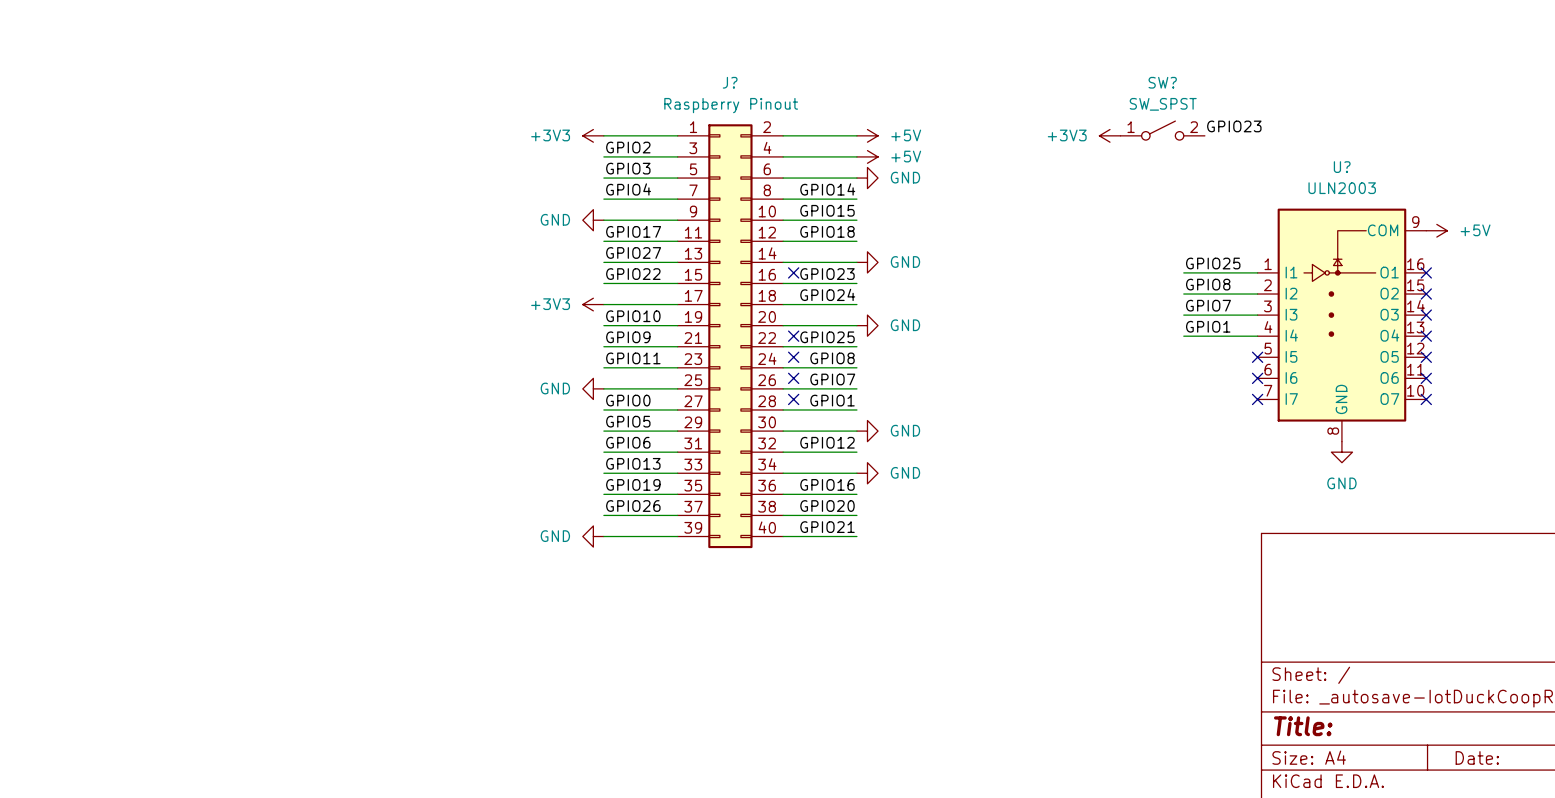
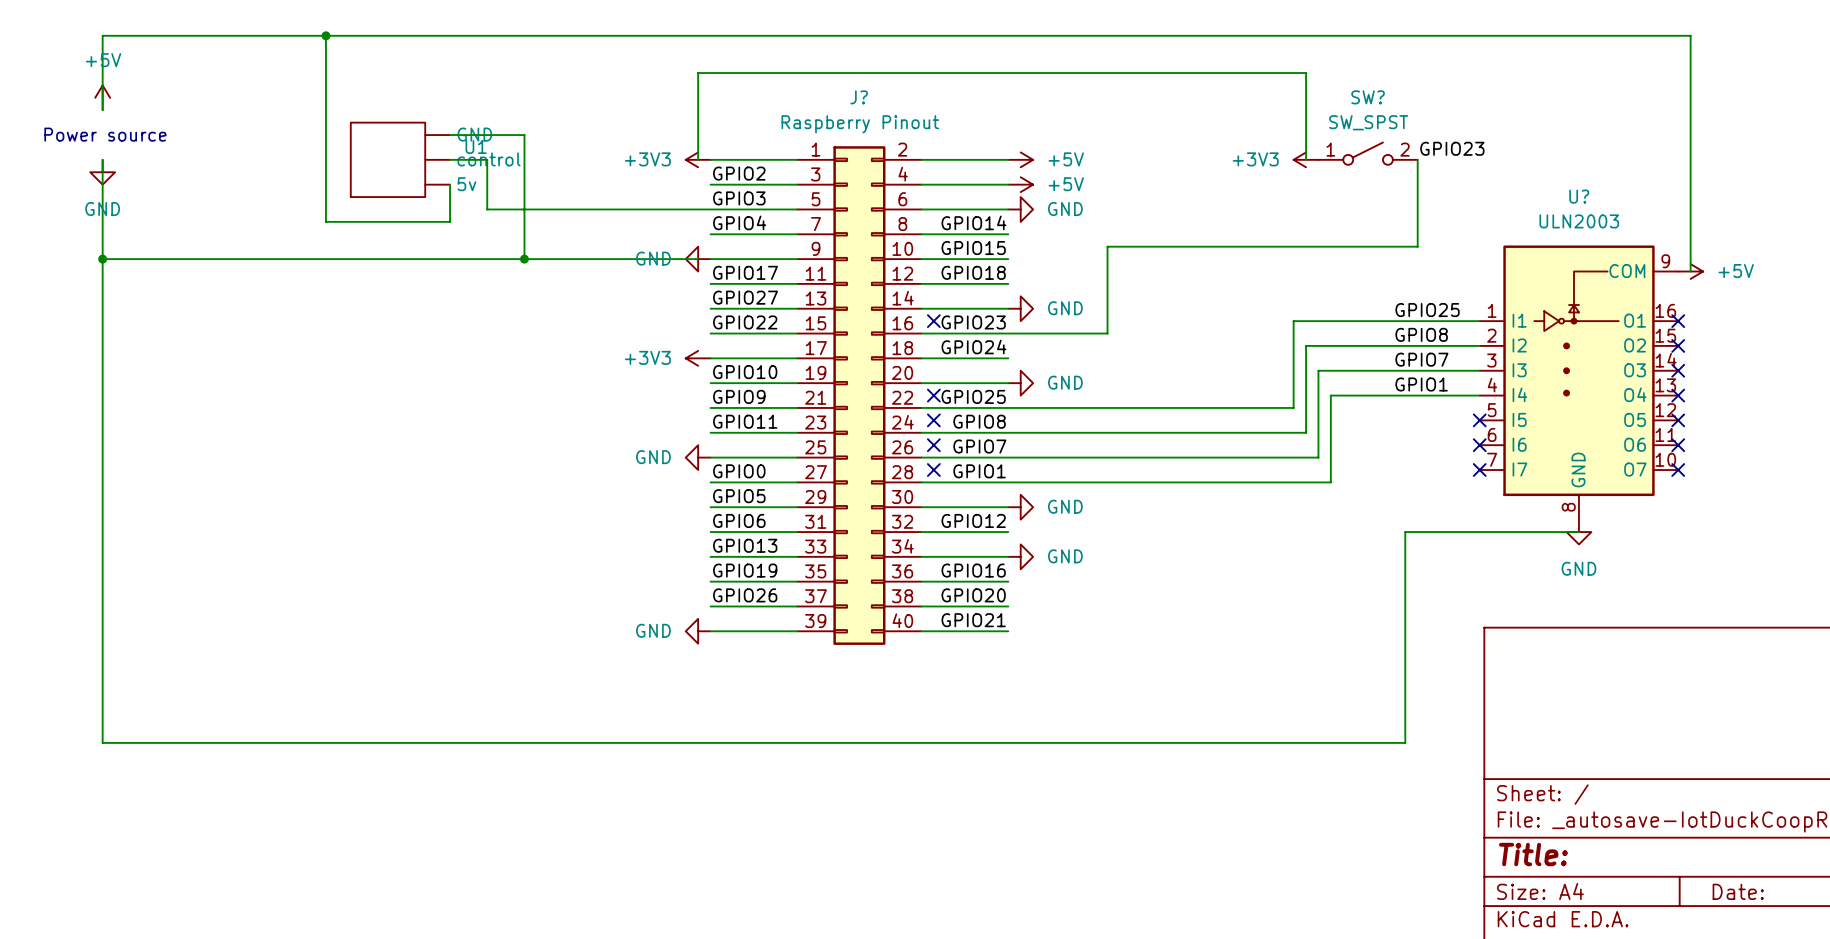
wire: none -> (325, 35) (325, 221) (450, 221) (450, 184)
junction: none -> (325, 35)
power symbol: none -> +5V (102, 97)
wire: none -> (102, 110) (102, 35) (1690, 35) (1690, 271)
text: none -> Power source (105, 134)
wire: none -> (450, 135) (524, 135) (524, 259)
wire: none -> (102, 159) (102, 742) (1405, 742) (1405, 532) (1578, 532)
U1: none -> (400, 159)
wire: none -> (450, 159) (487, 159) (487, 209) (710, 209)
wire: none -> (698, 159) (698, 73) (1306, 73) (1306, 159)
wire: none -> (1417, 159) (1417, 246) (1107, 246) (1107, 333) (1008, 333)
power symbol: none -> GND (102, 172)
wire: none -> (102, 259) (698, 259)
junction: none -> (102, 259)
junction: none -> (524, 259)
wire: none -> (1392, 321) (1293, 321) (1293, 407) (1008, 407)
wire: none -> (1392, 345) (1306, 345) (1306, 432) (1008, 432)
wire: none -> (1392, 370) (1318, 370) (1318, 457) (1008, 457)
wire: none -> (1392, 395) (1330, 395) (1330, 482) (1008, 482)

